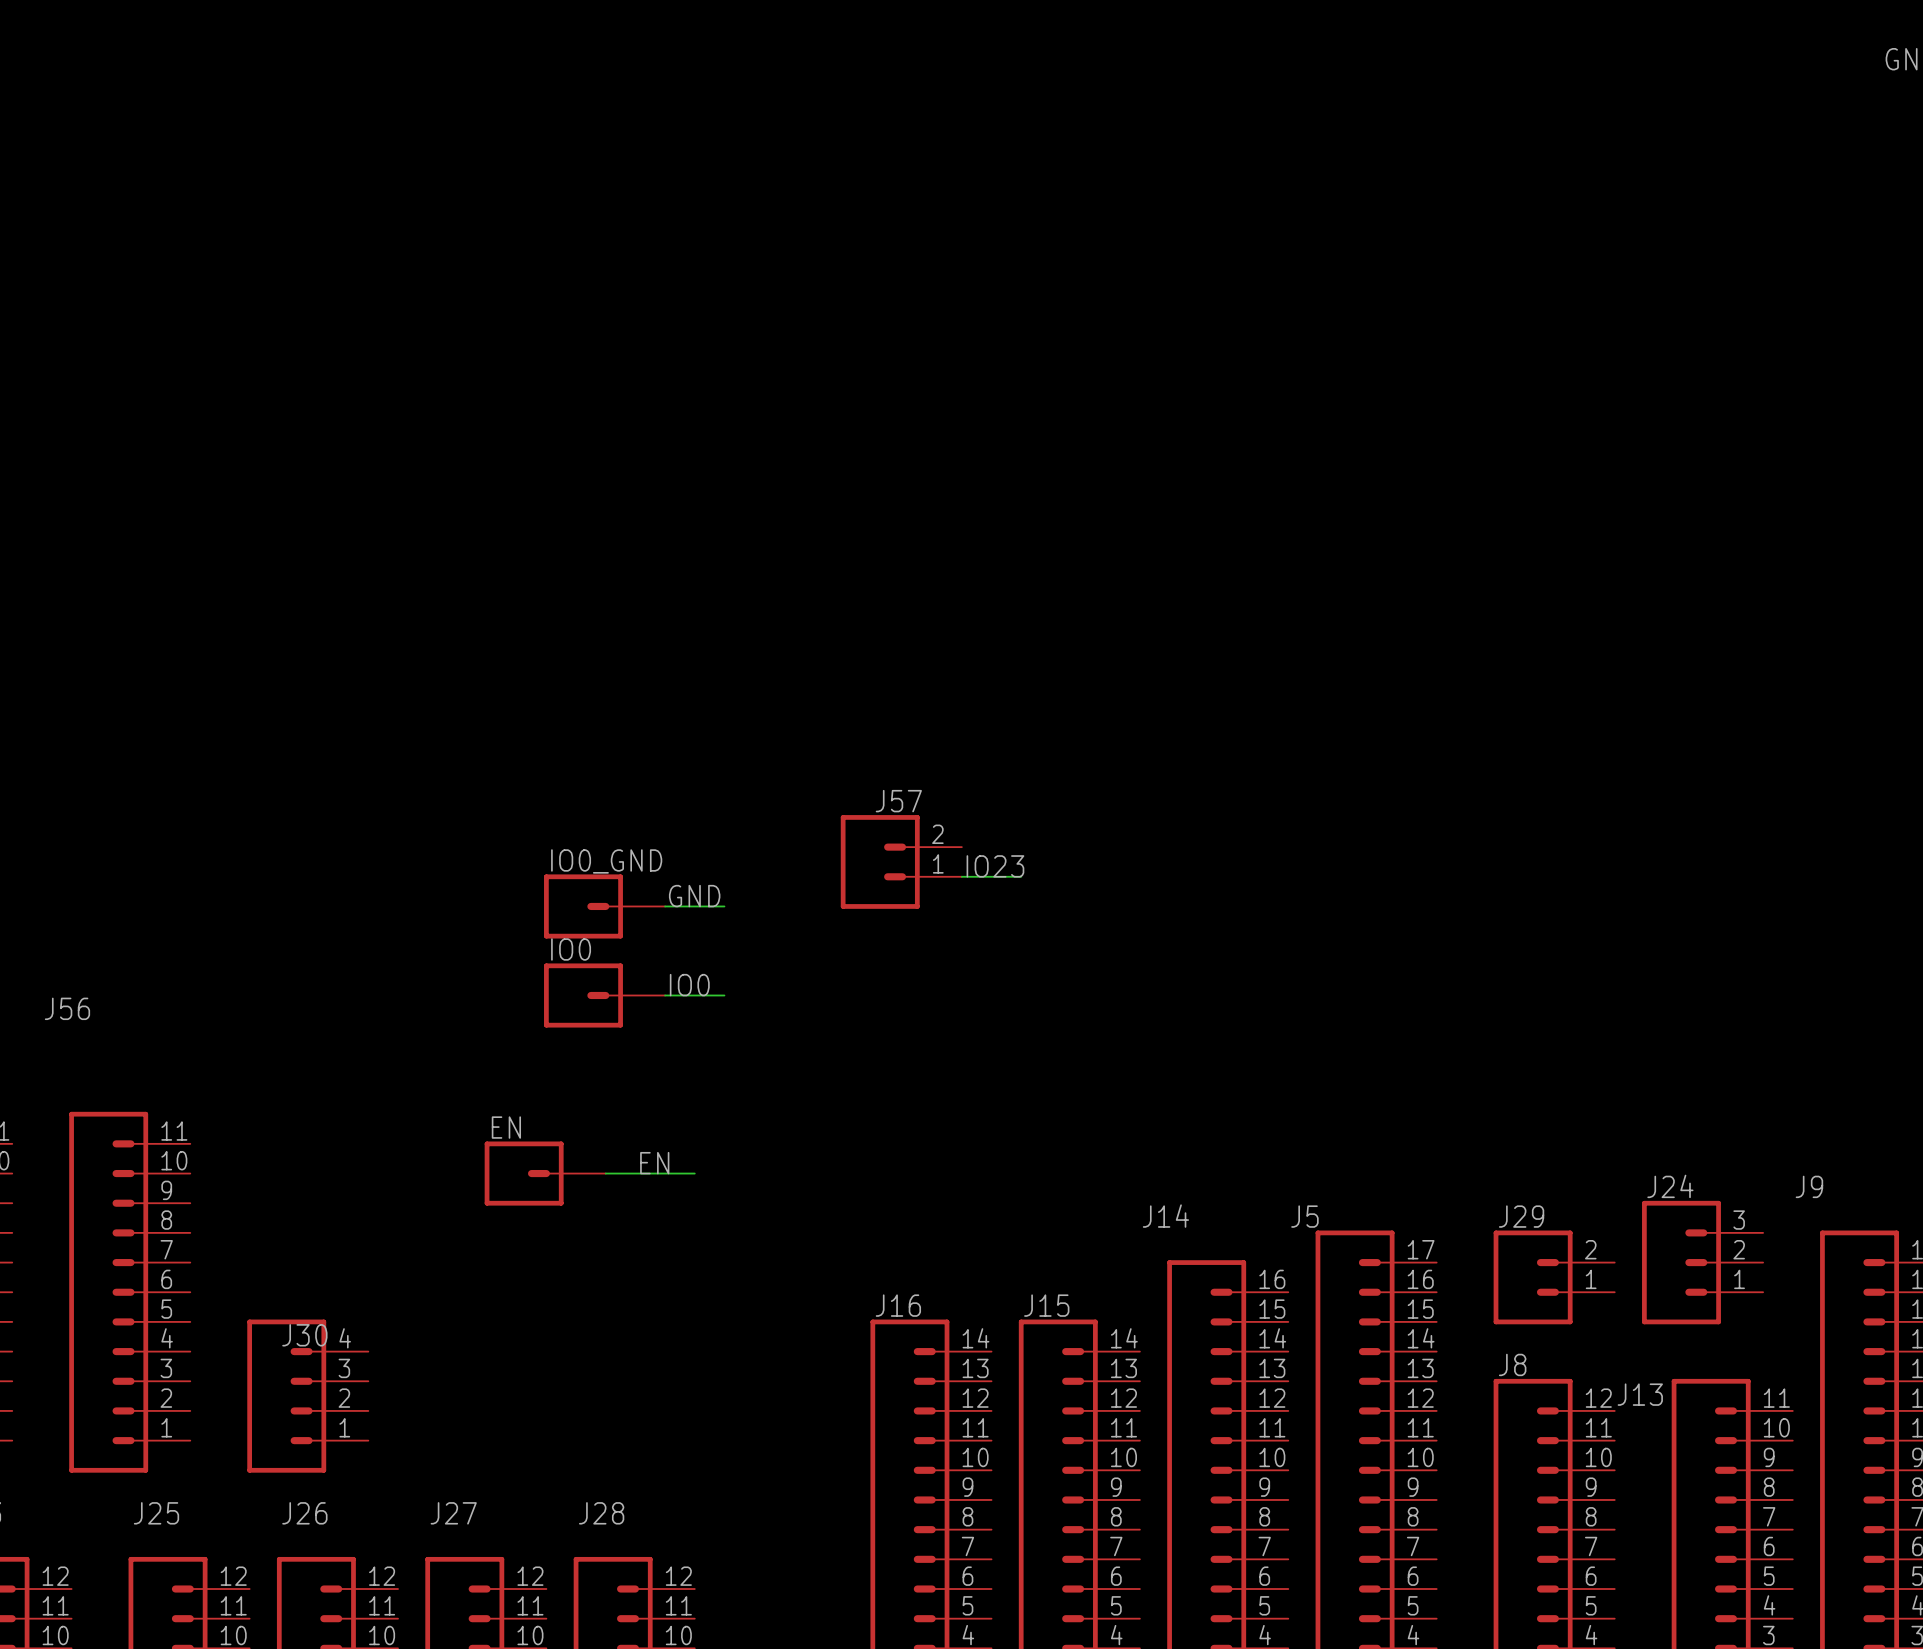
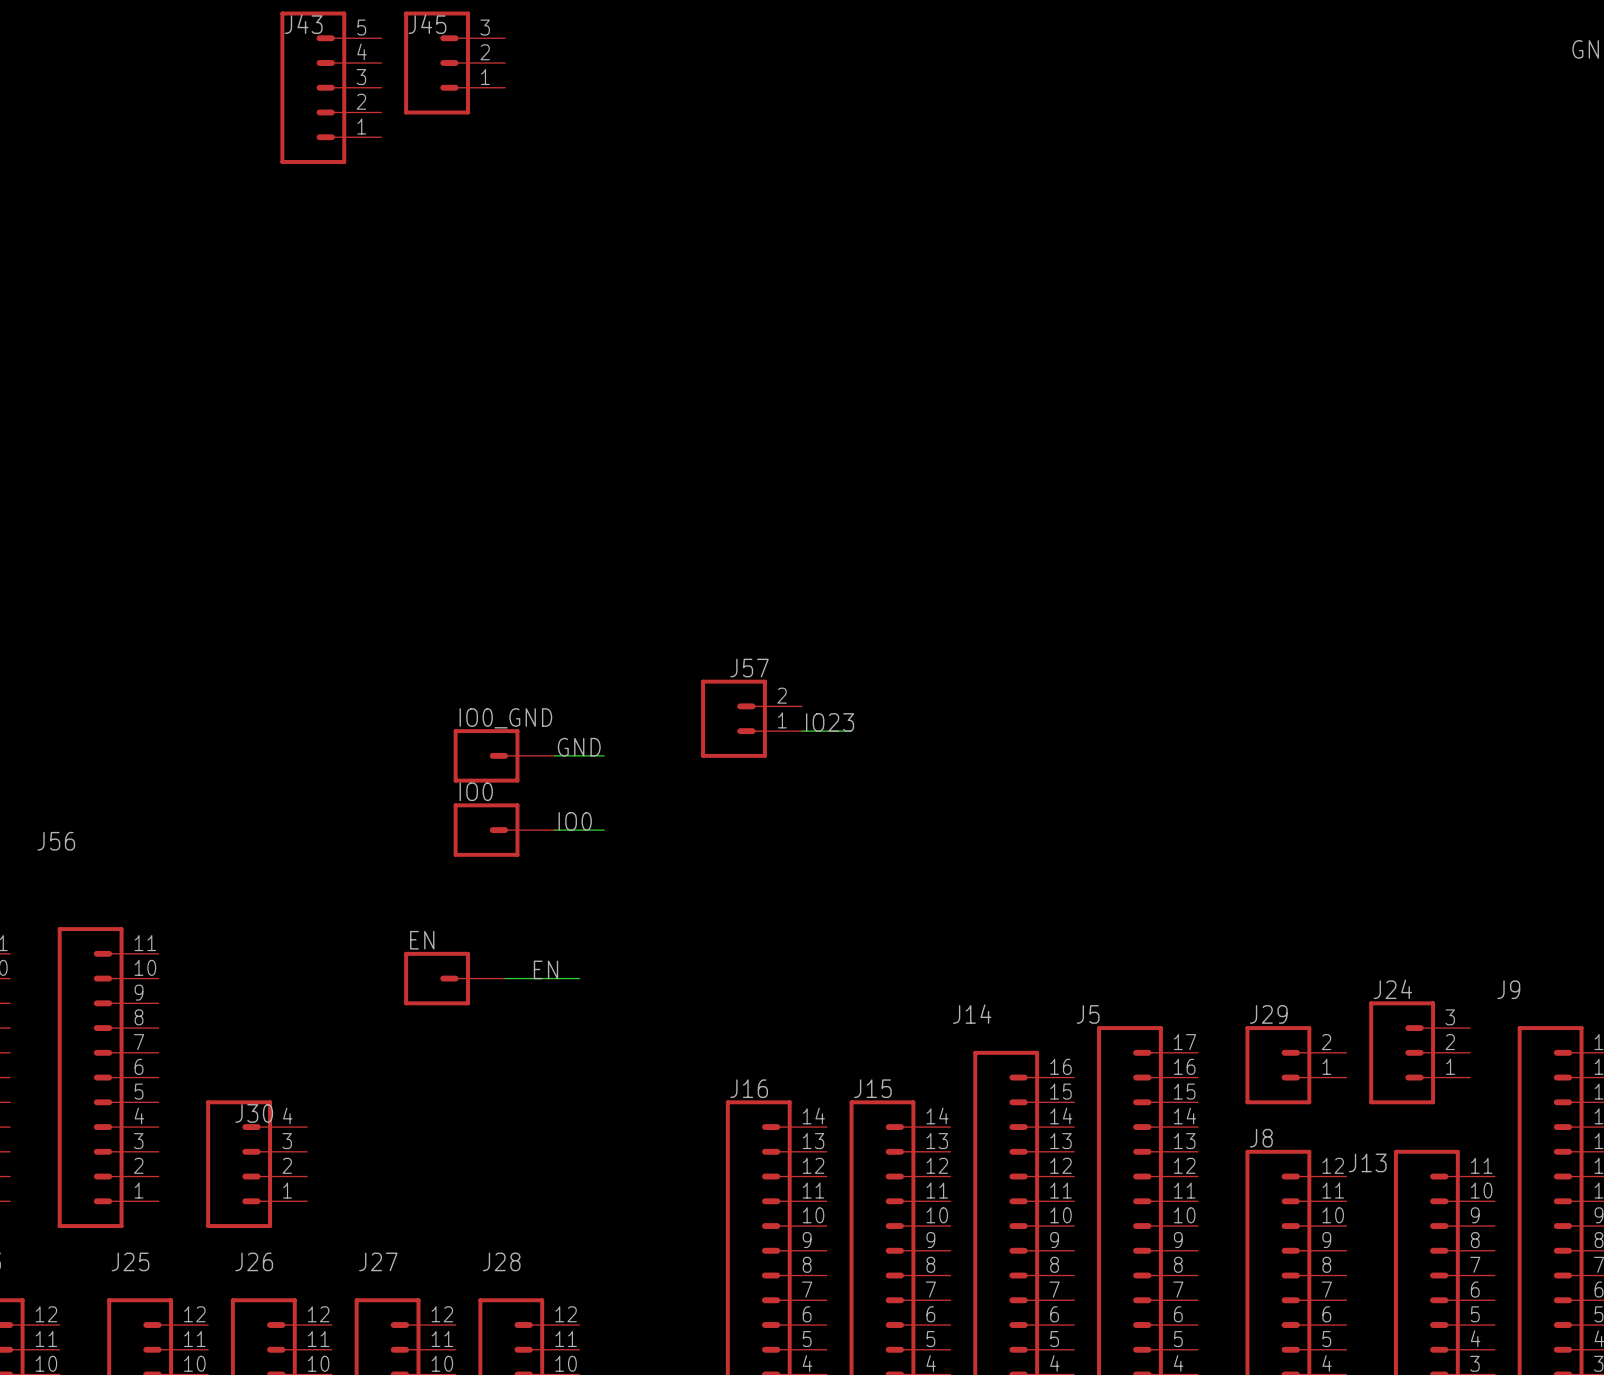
J45: none -> (454, 62)
J43: none -> (330, 87)

